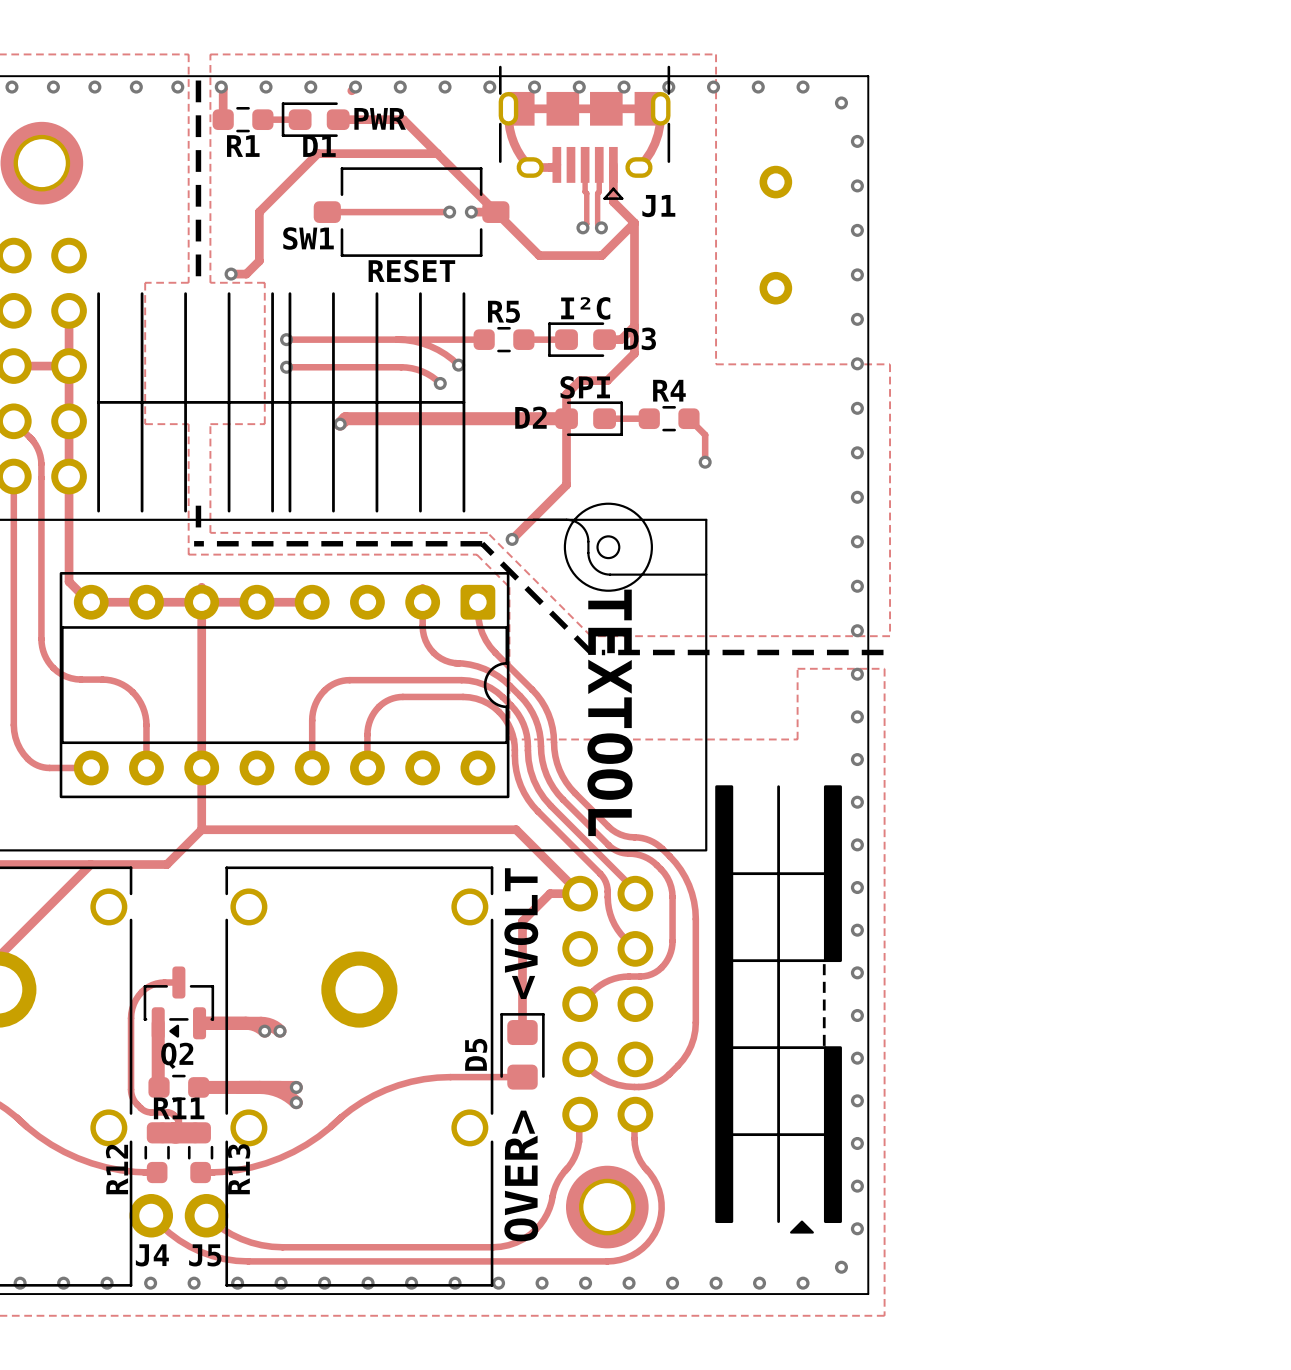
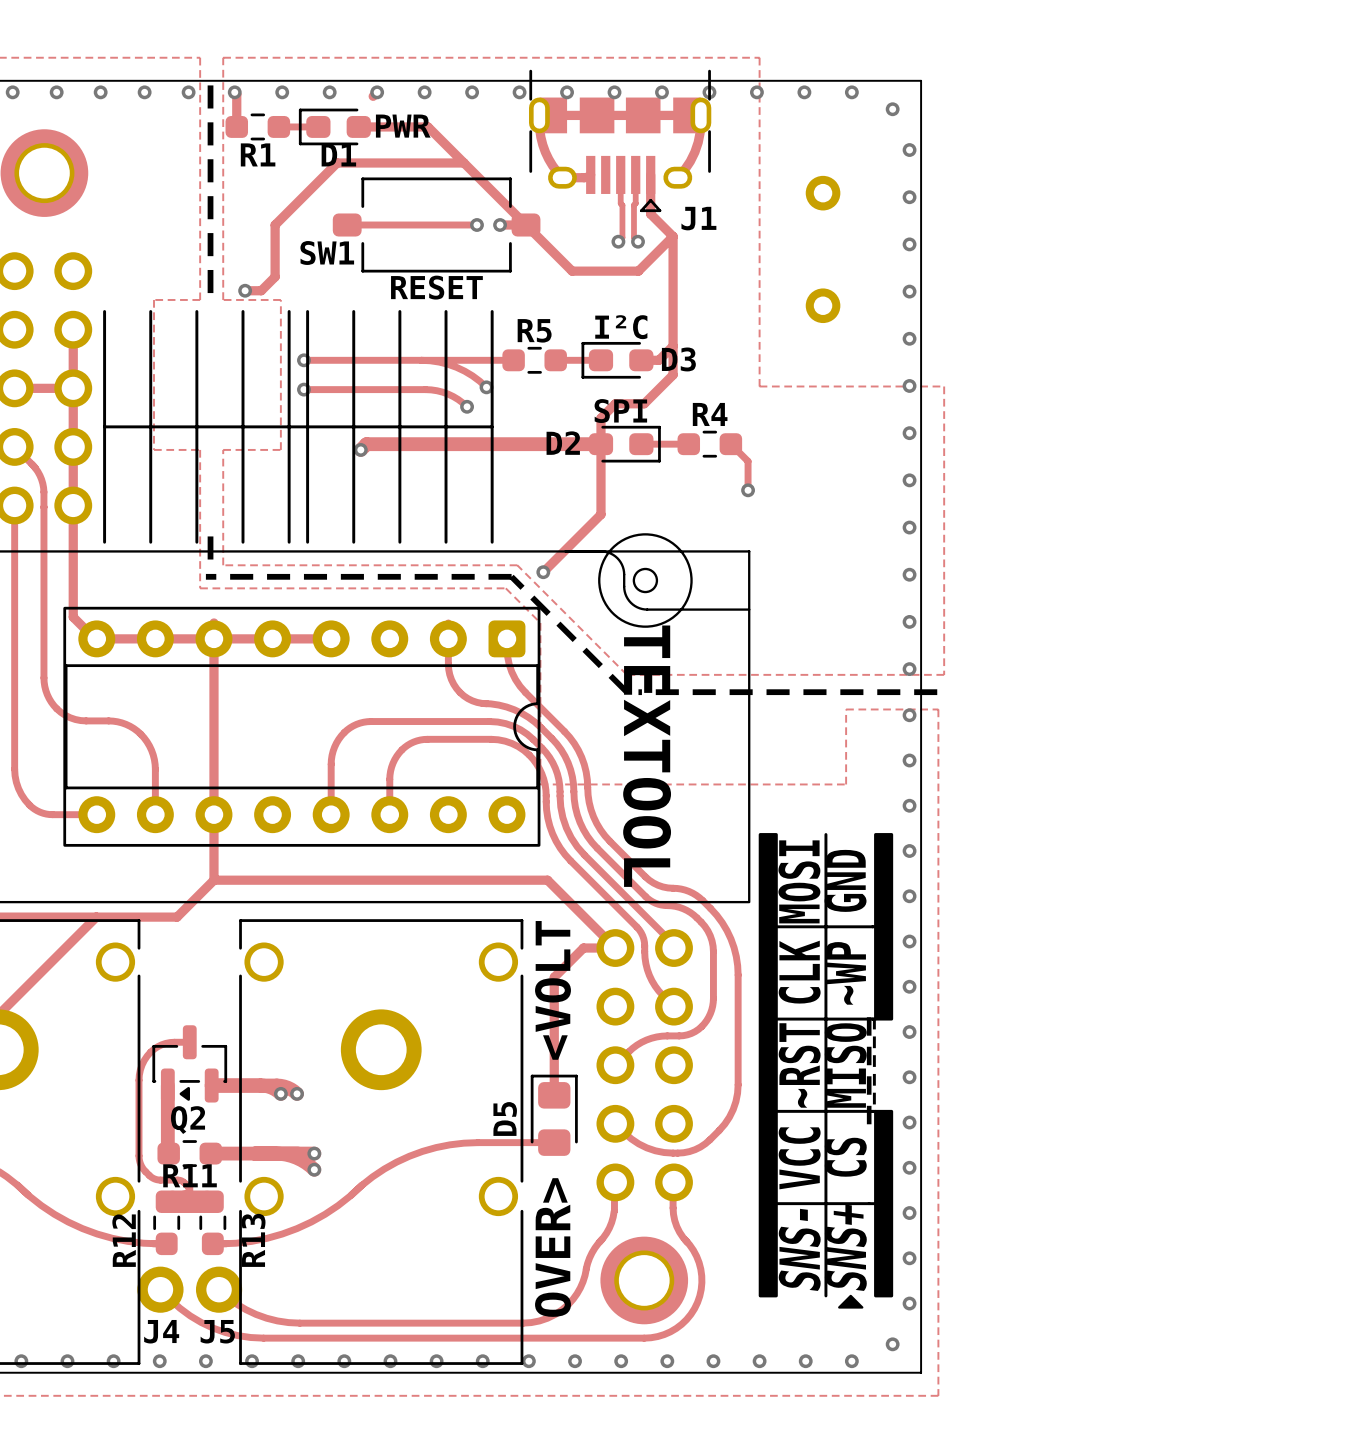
text: none -> GND (845, 880)
text: none -> MOSI (799, 881)
text: none -> CLK (799, 972)
text: none -> ~WP (845, 973)
line: none -> (869, 1017) (869, 1134)
text: none -> ~RST (799, 1065)
text: none -> MISO (845, 1065)
text: none -> CS (845, 1157)
text: none -> VCC (799, 1158)
text: none -> SNS+ (845, 1247)
text: none -> SNS- (799, 1249)

